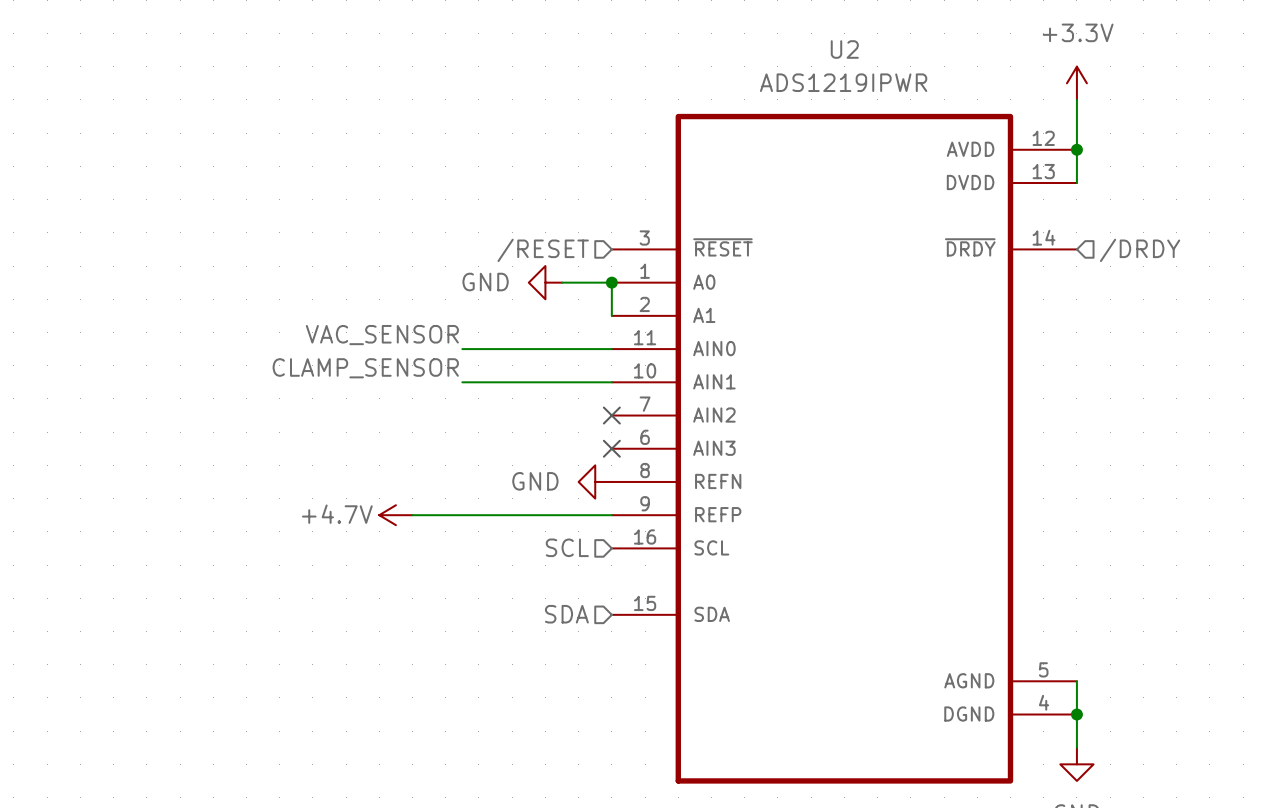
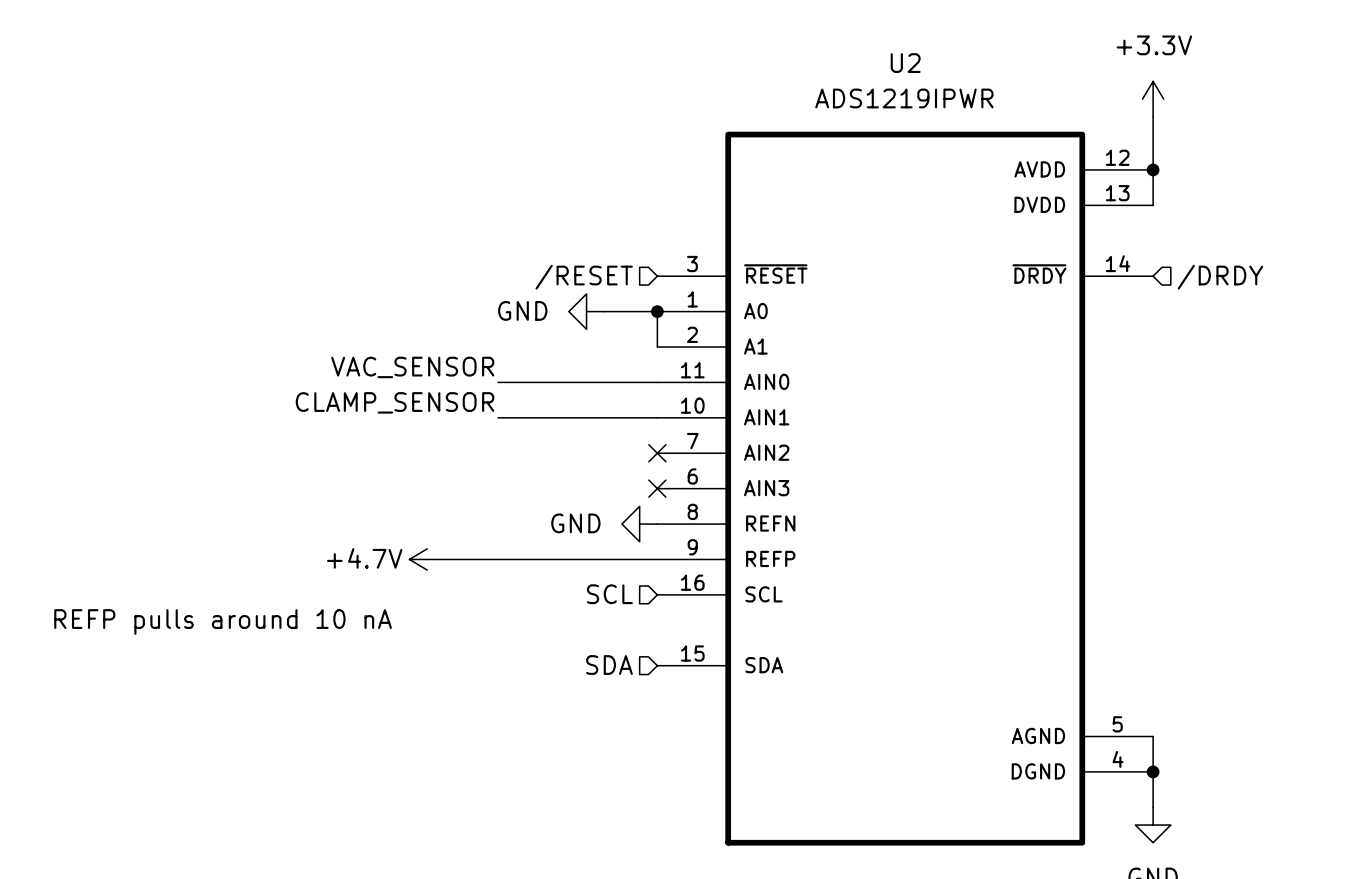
text: none -> REFP pulls around 10 nA (223, 622)

